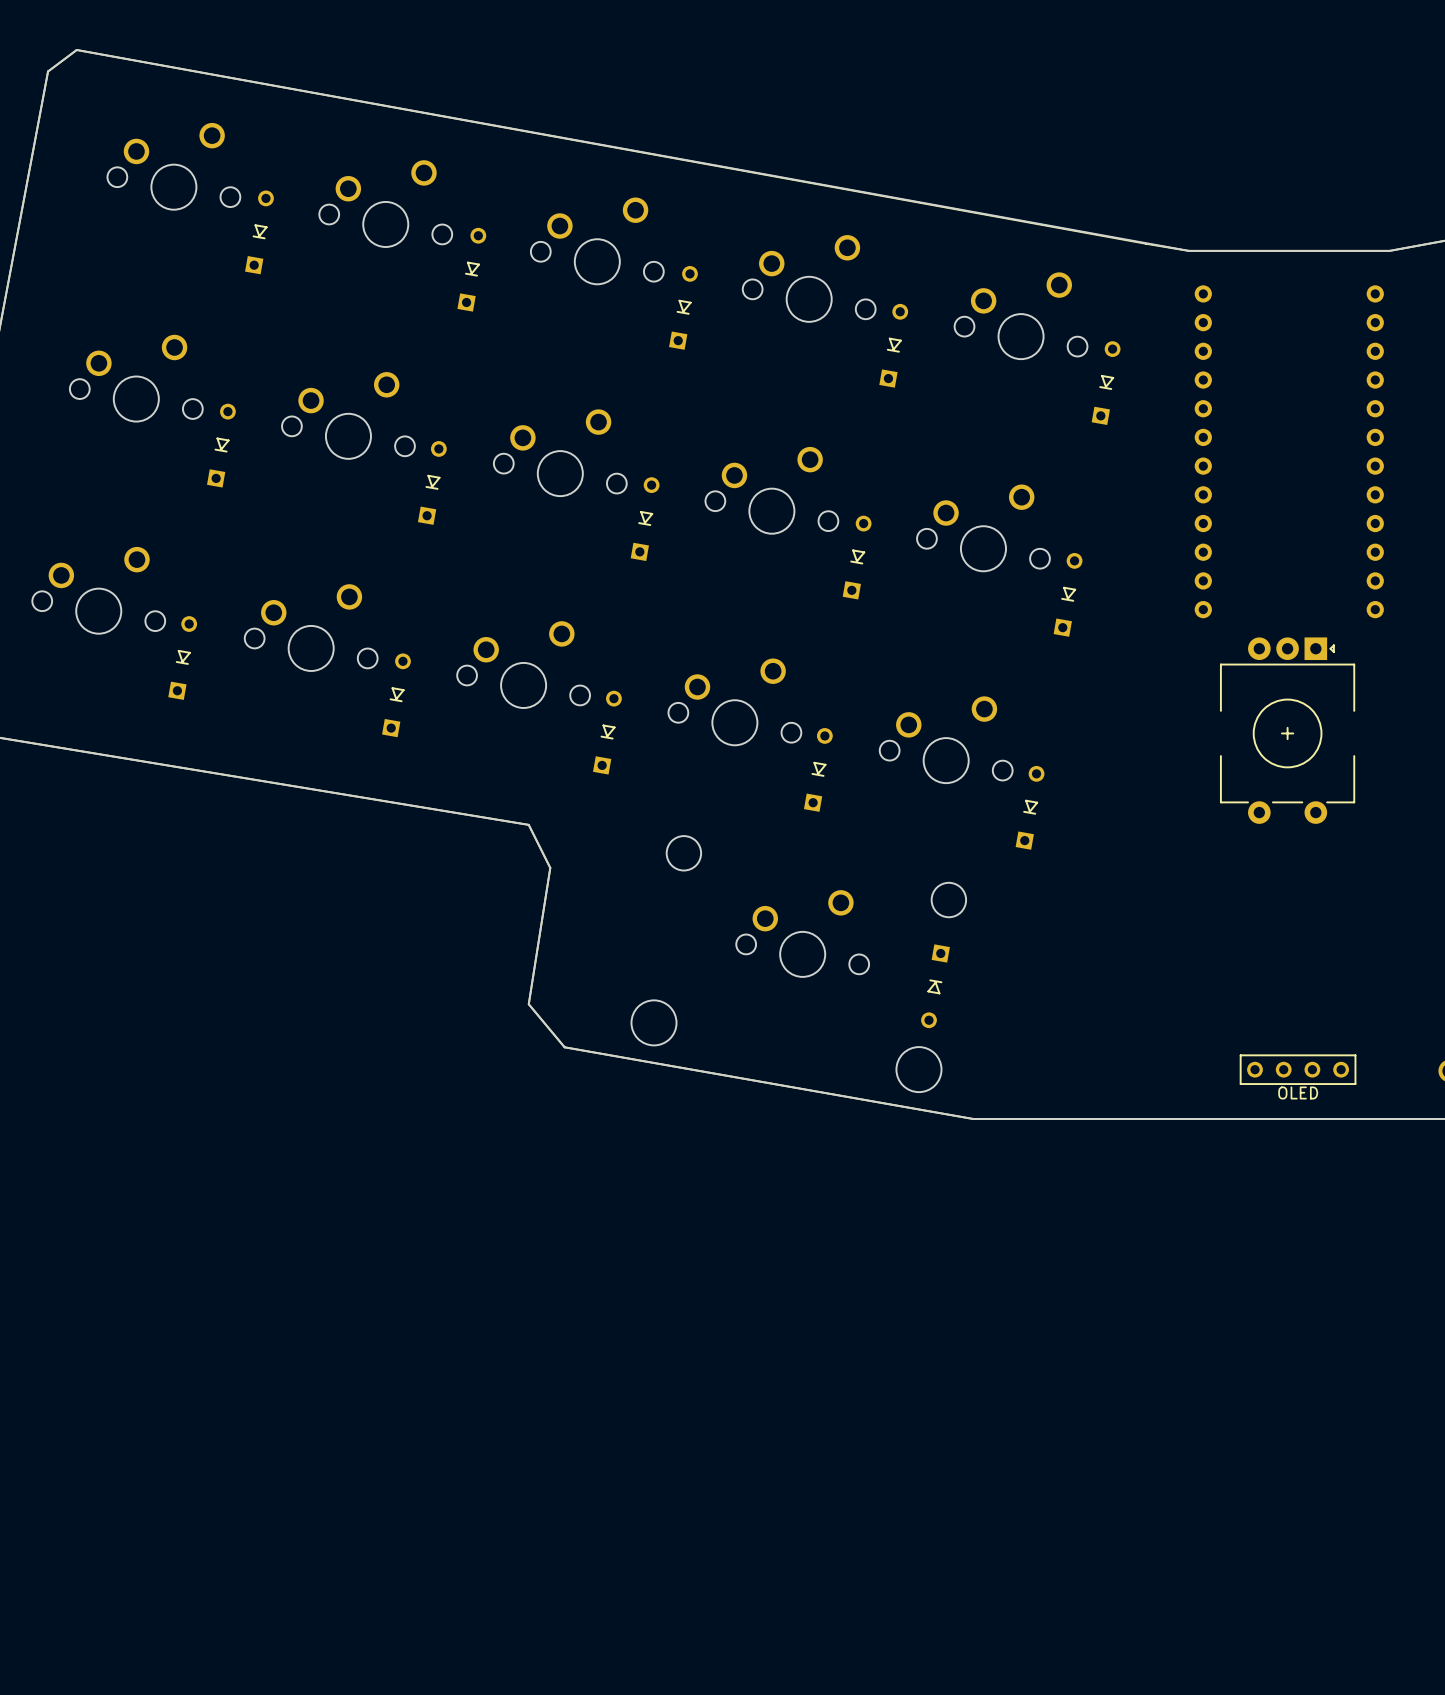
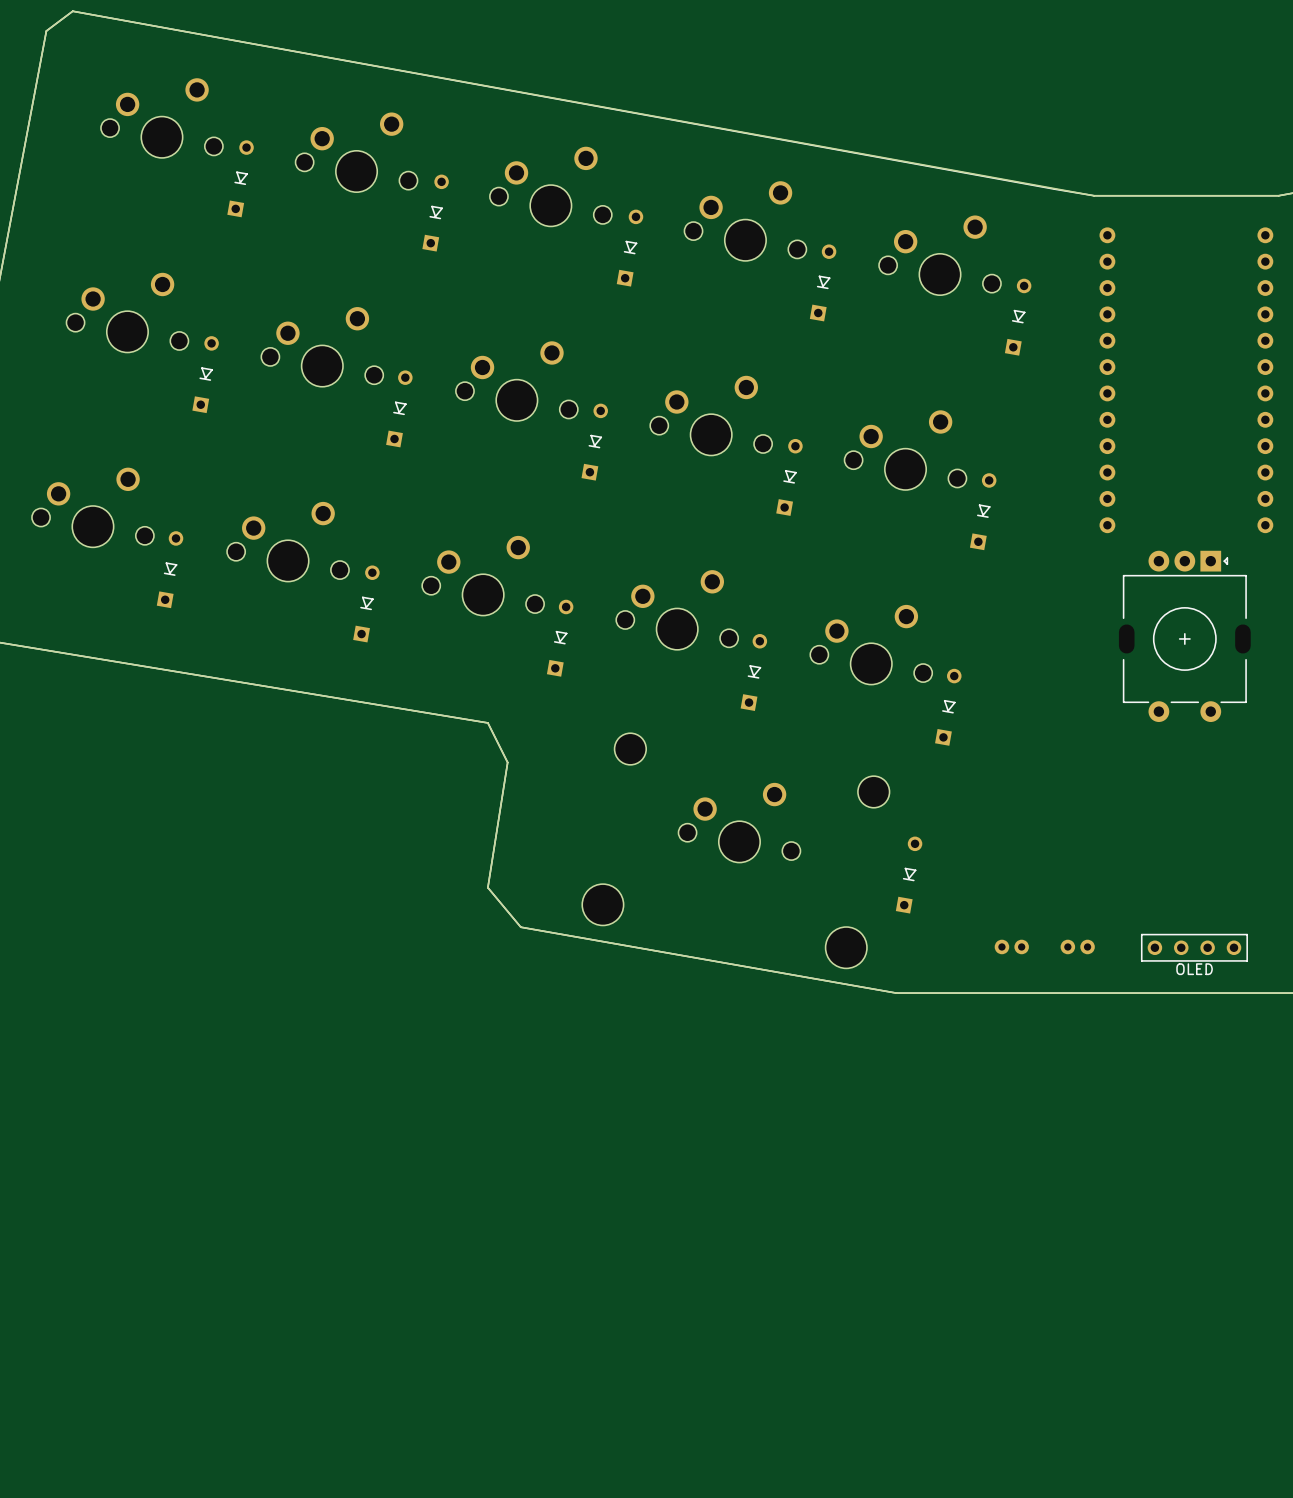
part rotation: 0° (935, 986) -> 180° (909, 875)
part position: (935, 986) -> (909, 875)
part: none -> (1011, 946)
part: none -> (1077, 946)

